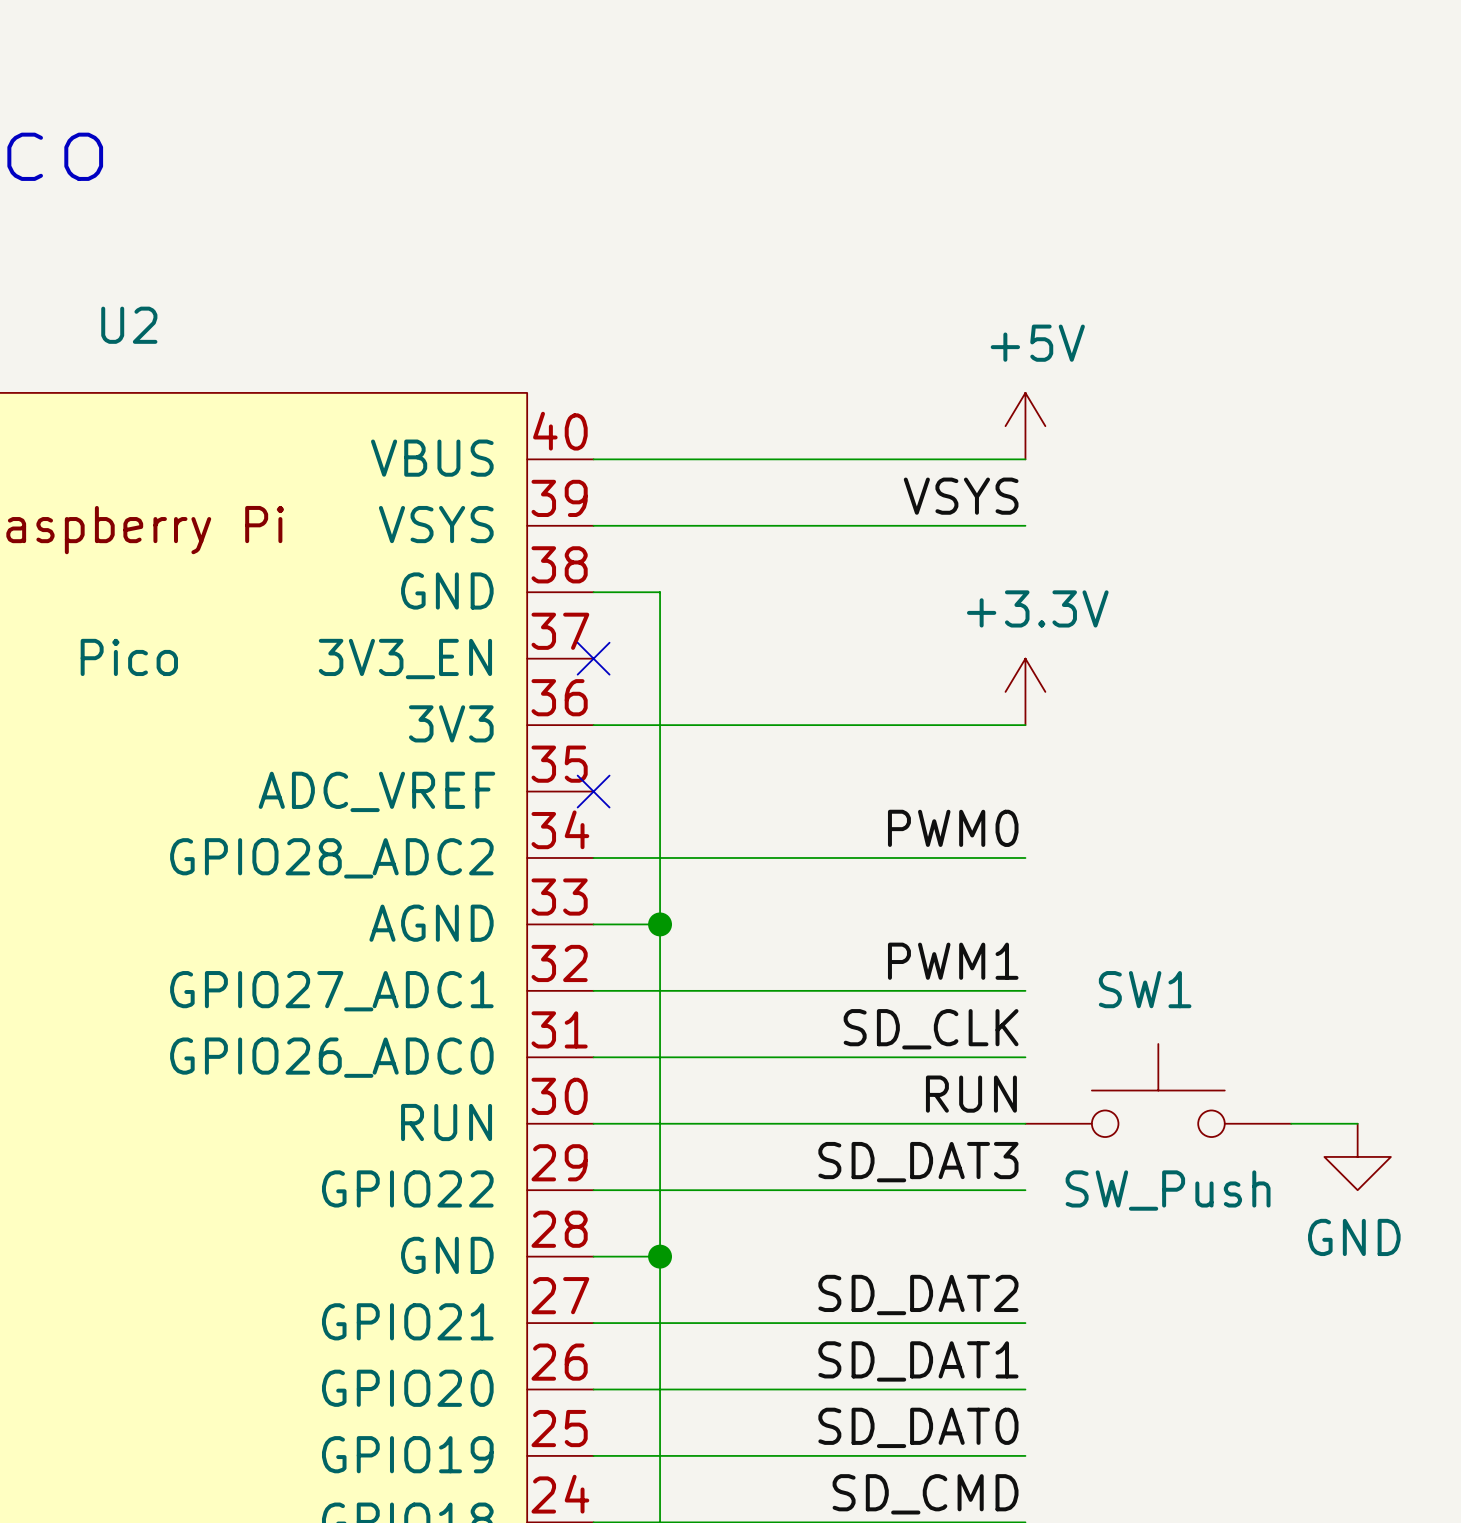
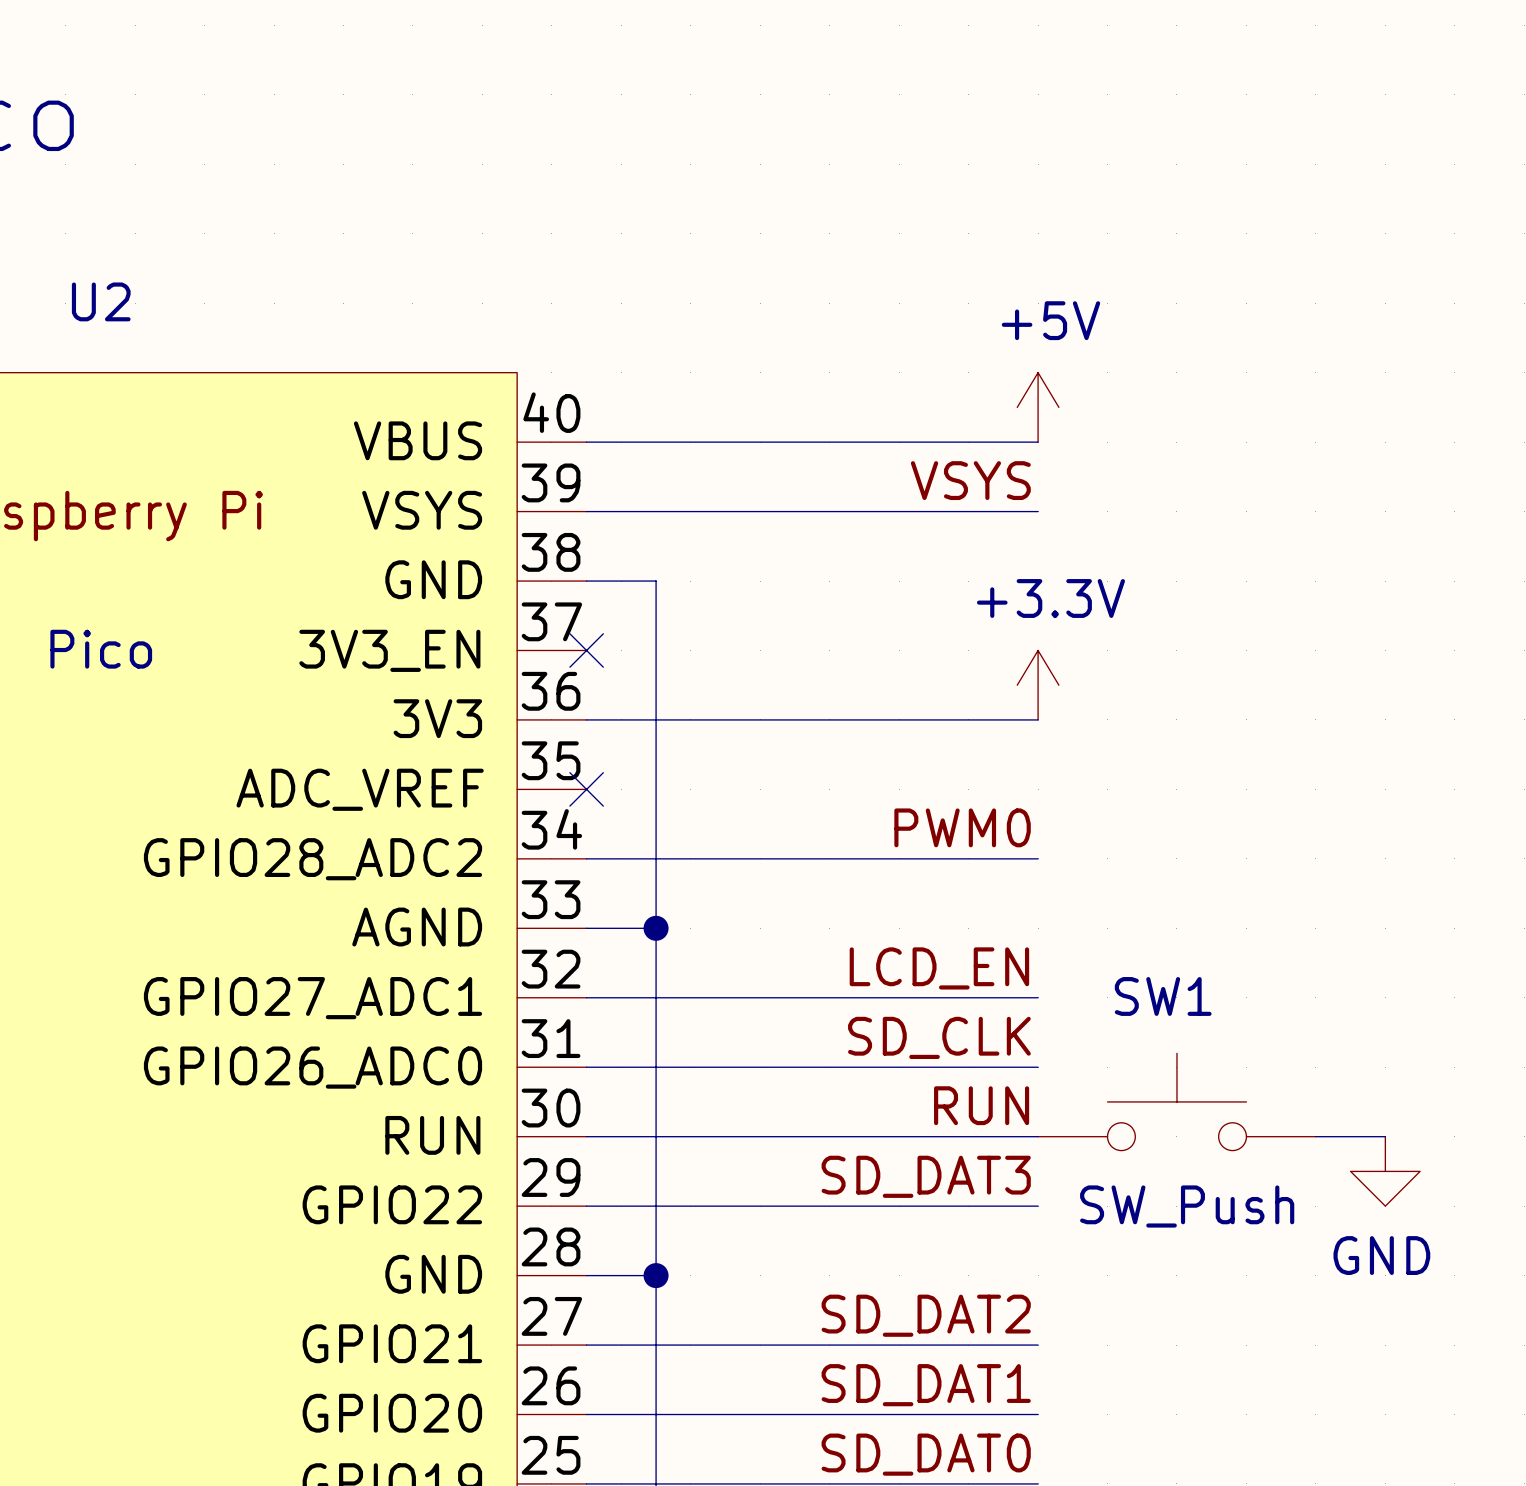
label: PWM1 (953, 961) -> LCD_EN (939, 968)

